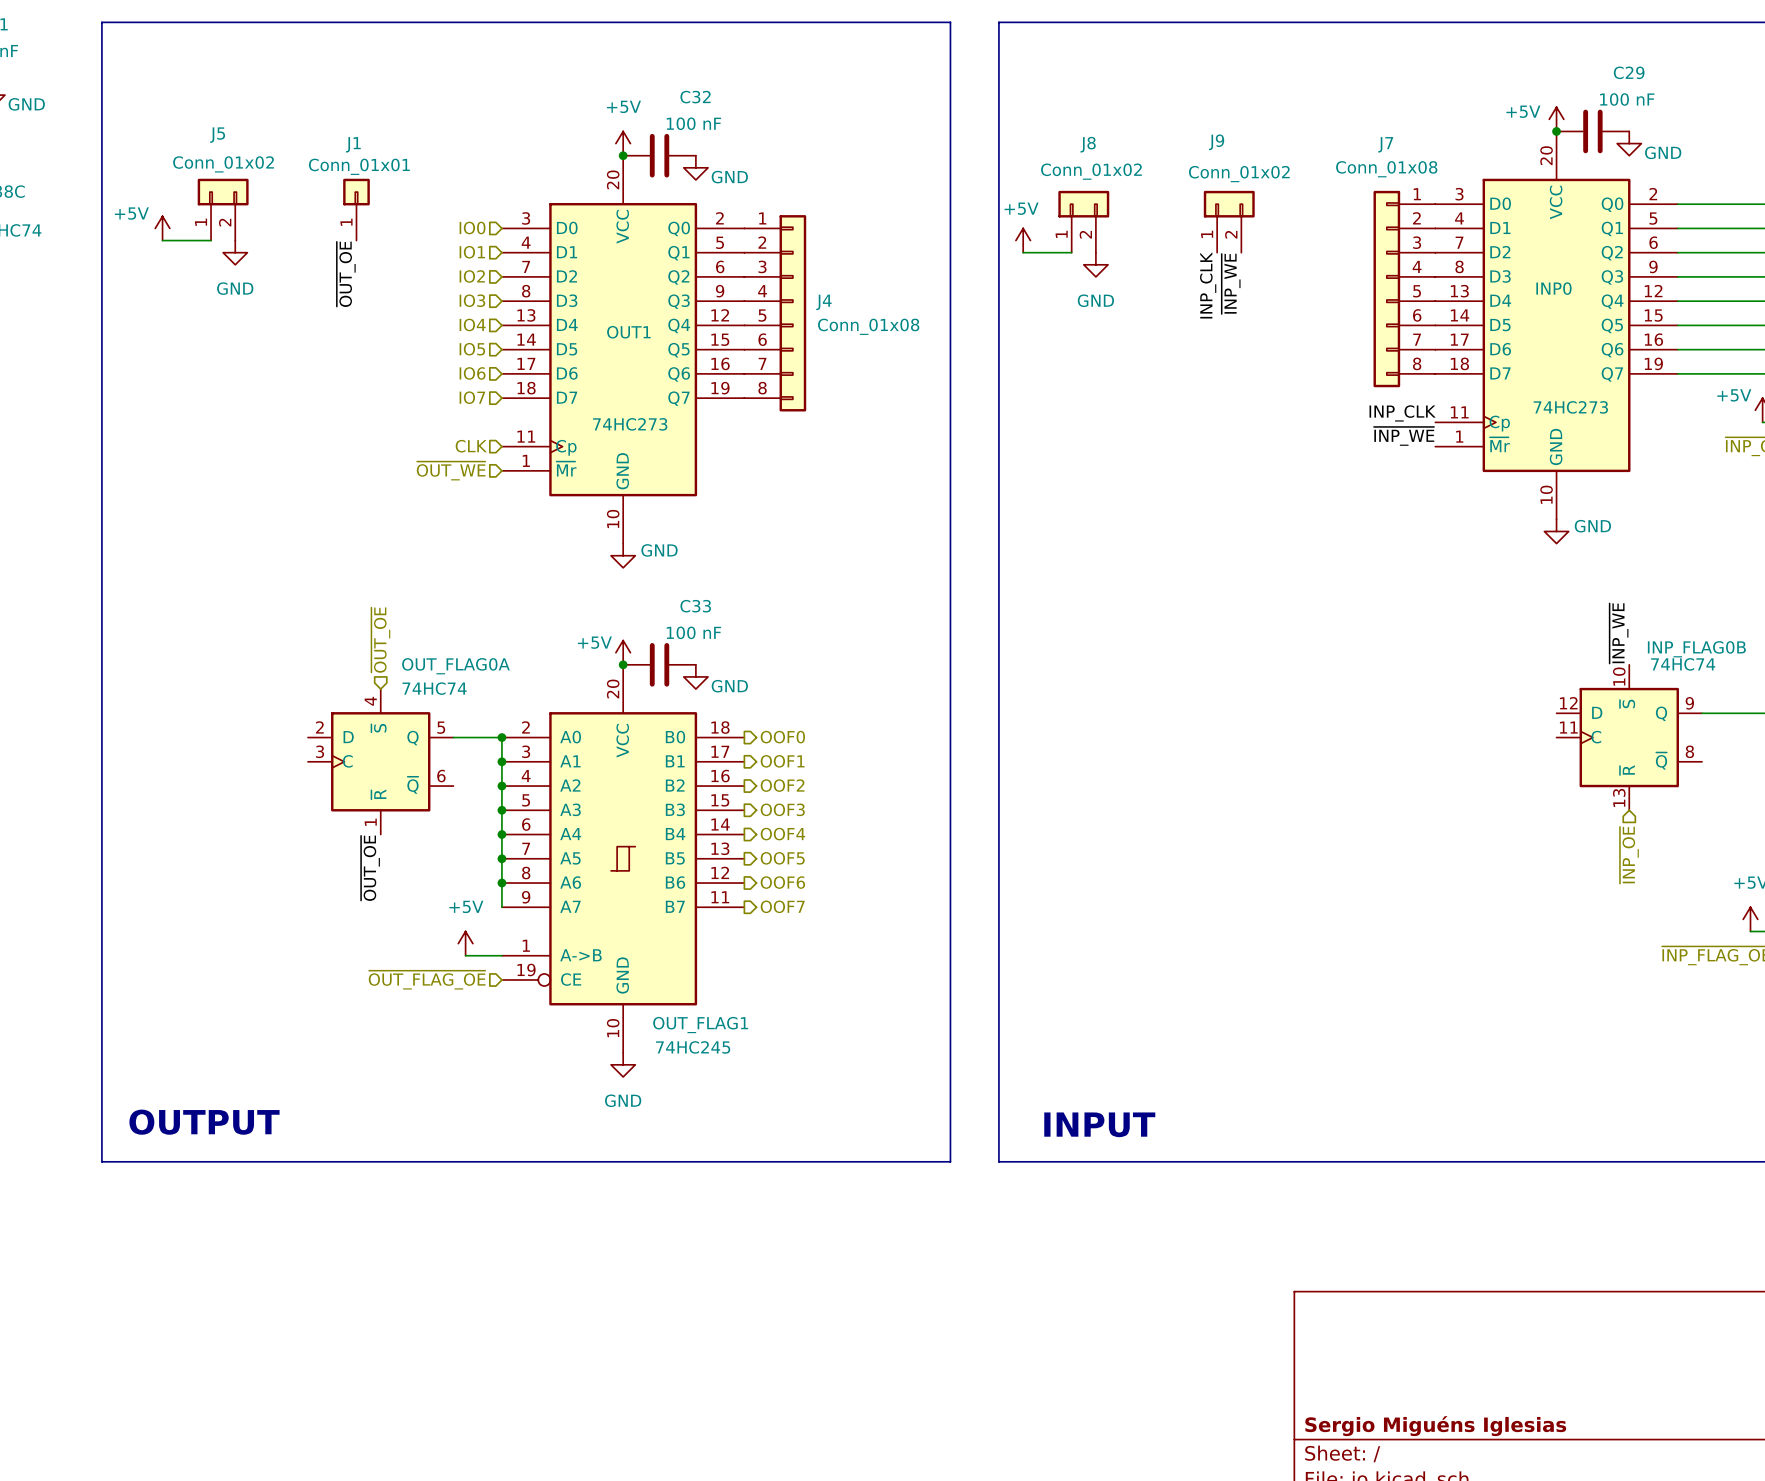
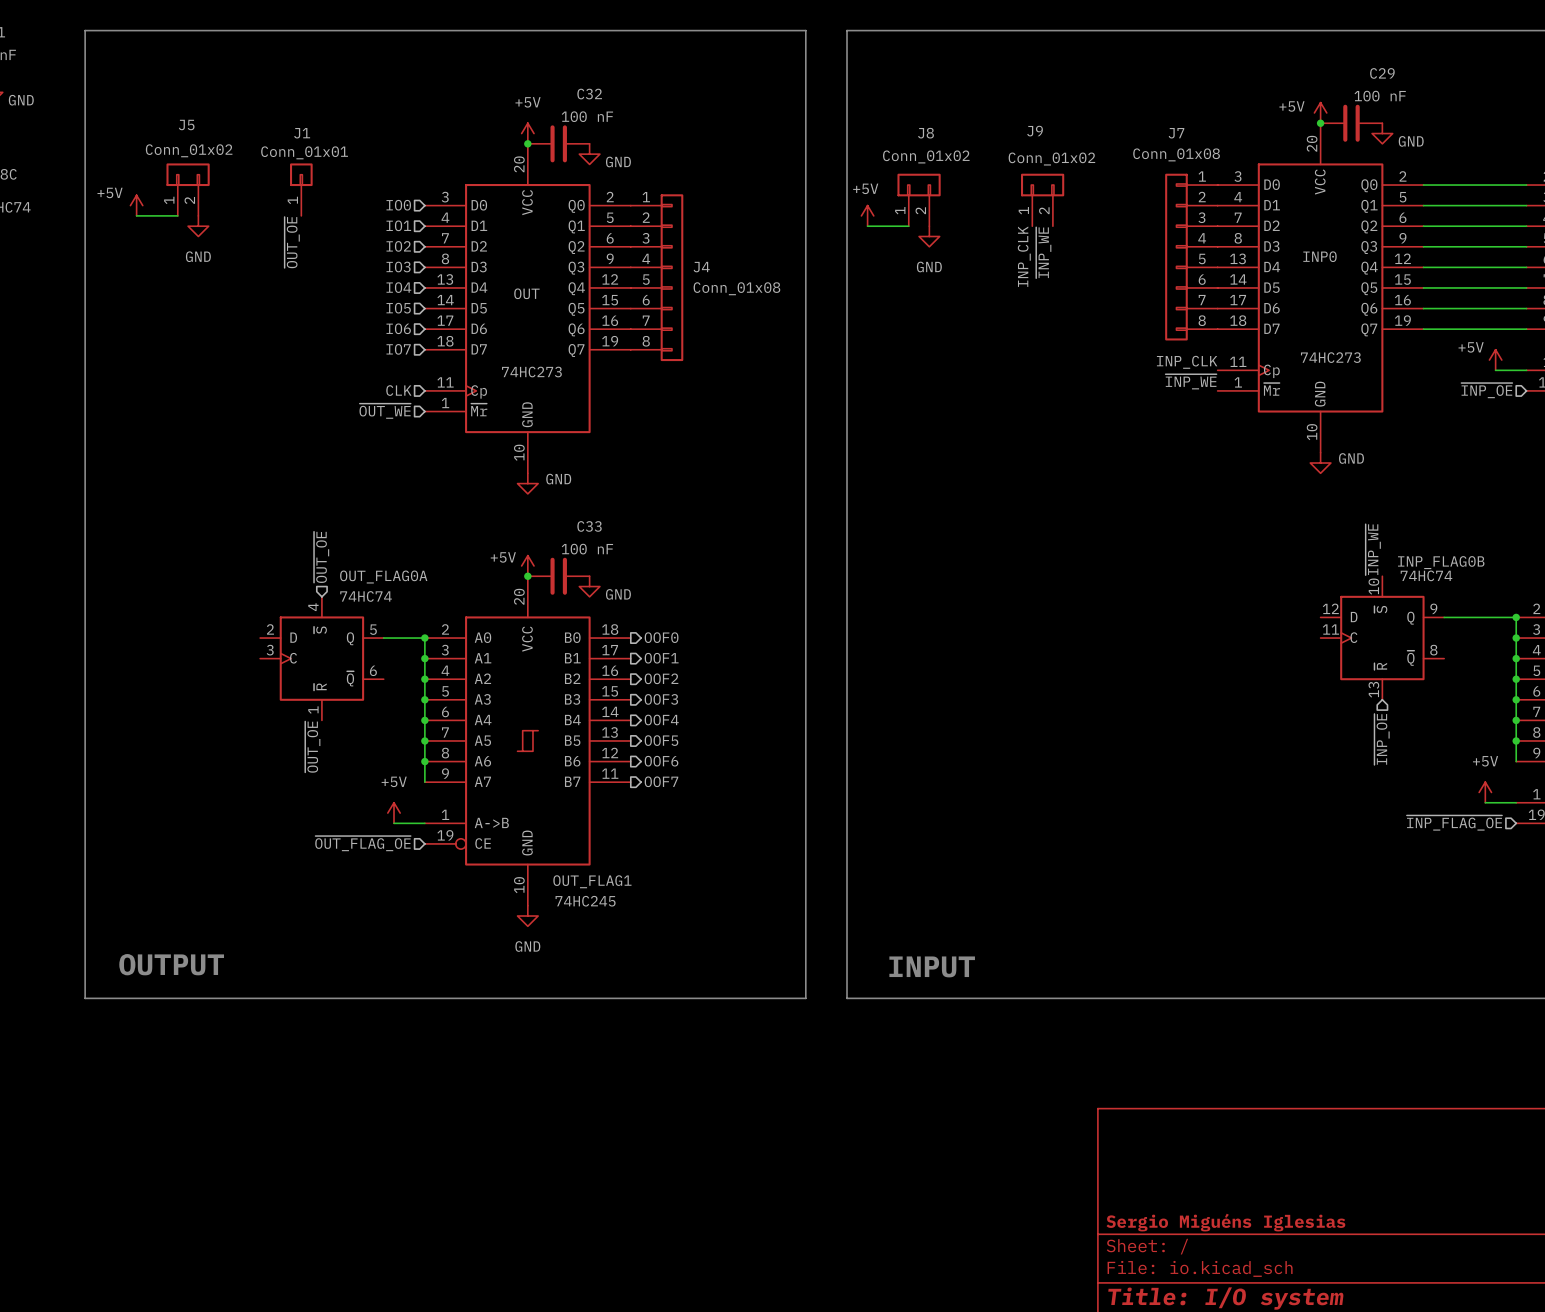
OUT1 name: OUT1 (628, 332) -> OUT (526, 293)

